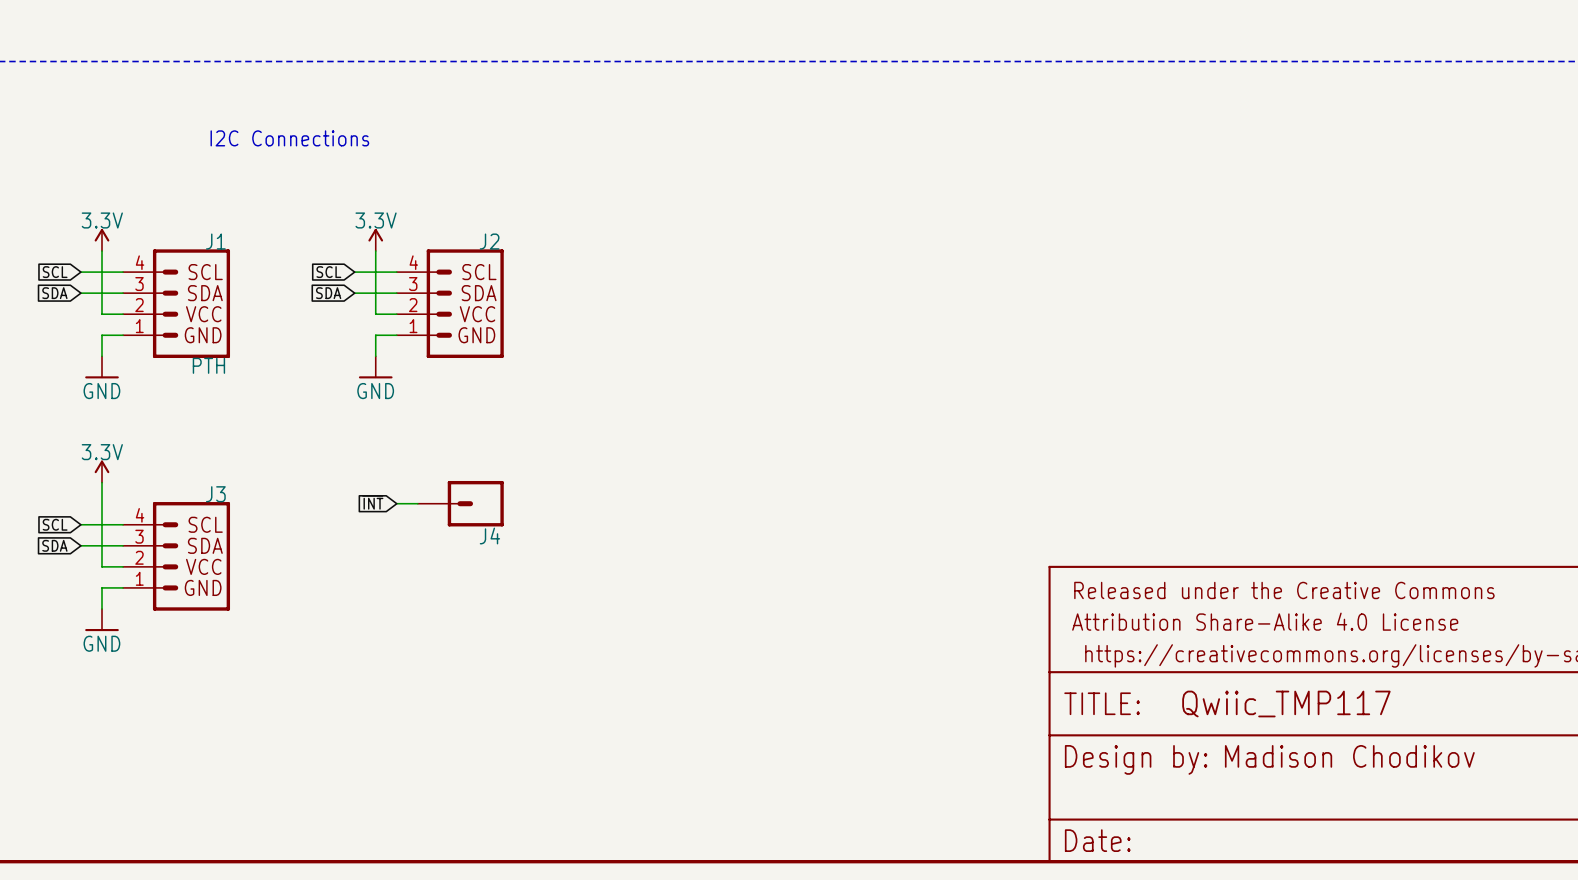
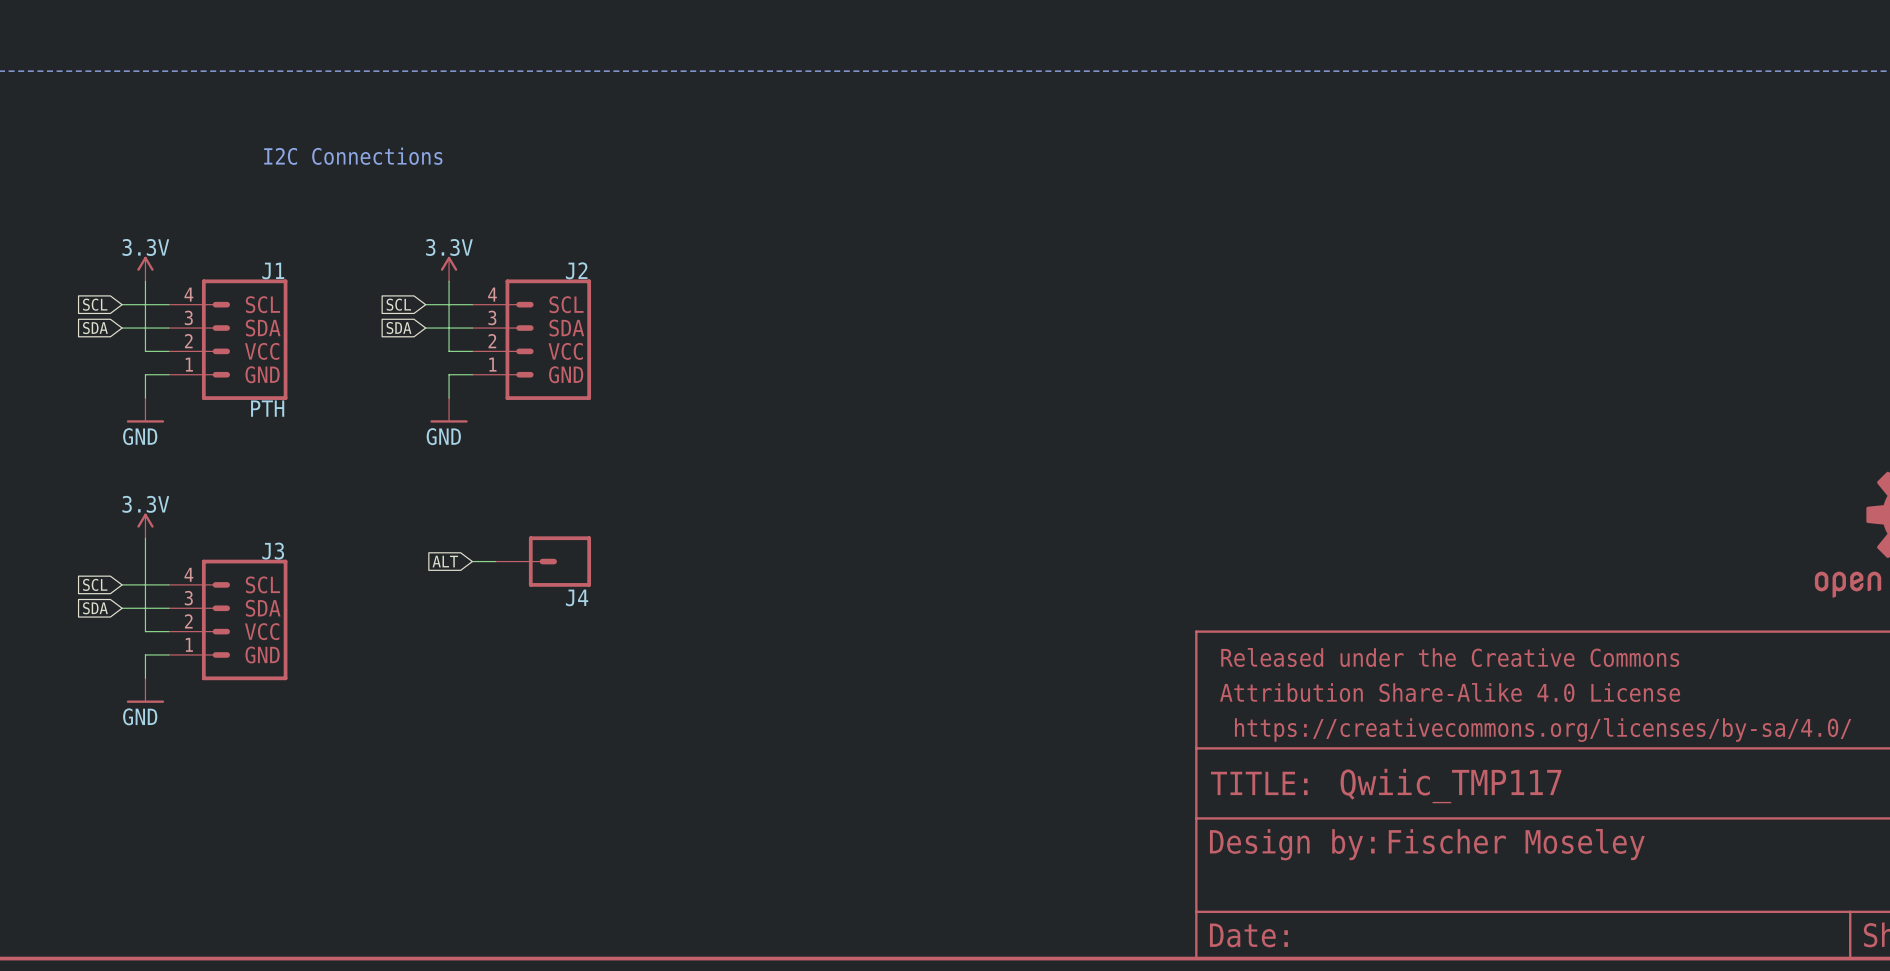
global label: ~{INT} (372, 502) -> ALT (445, 561)
text: Madison Chodikov (1349, 756) -> Fischer Moseley (1516, 844)

